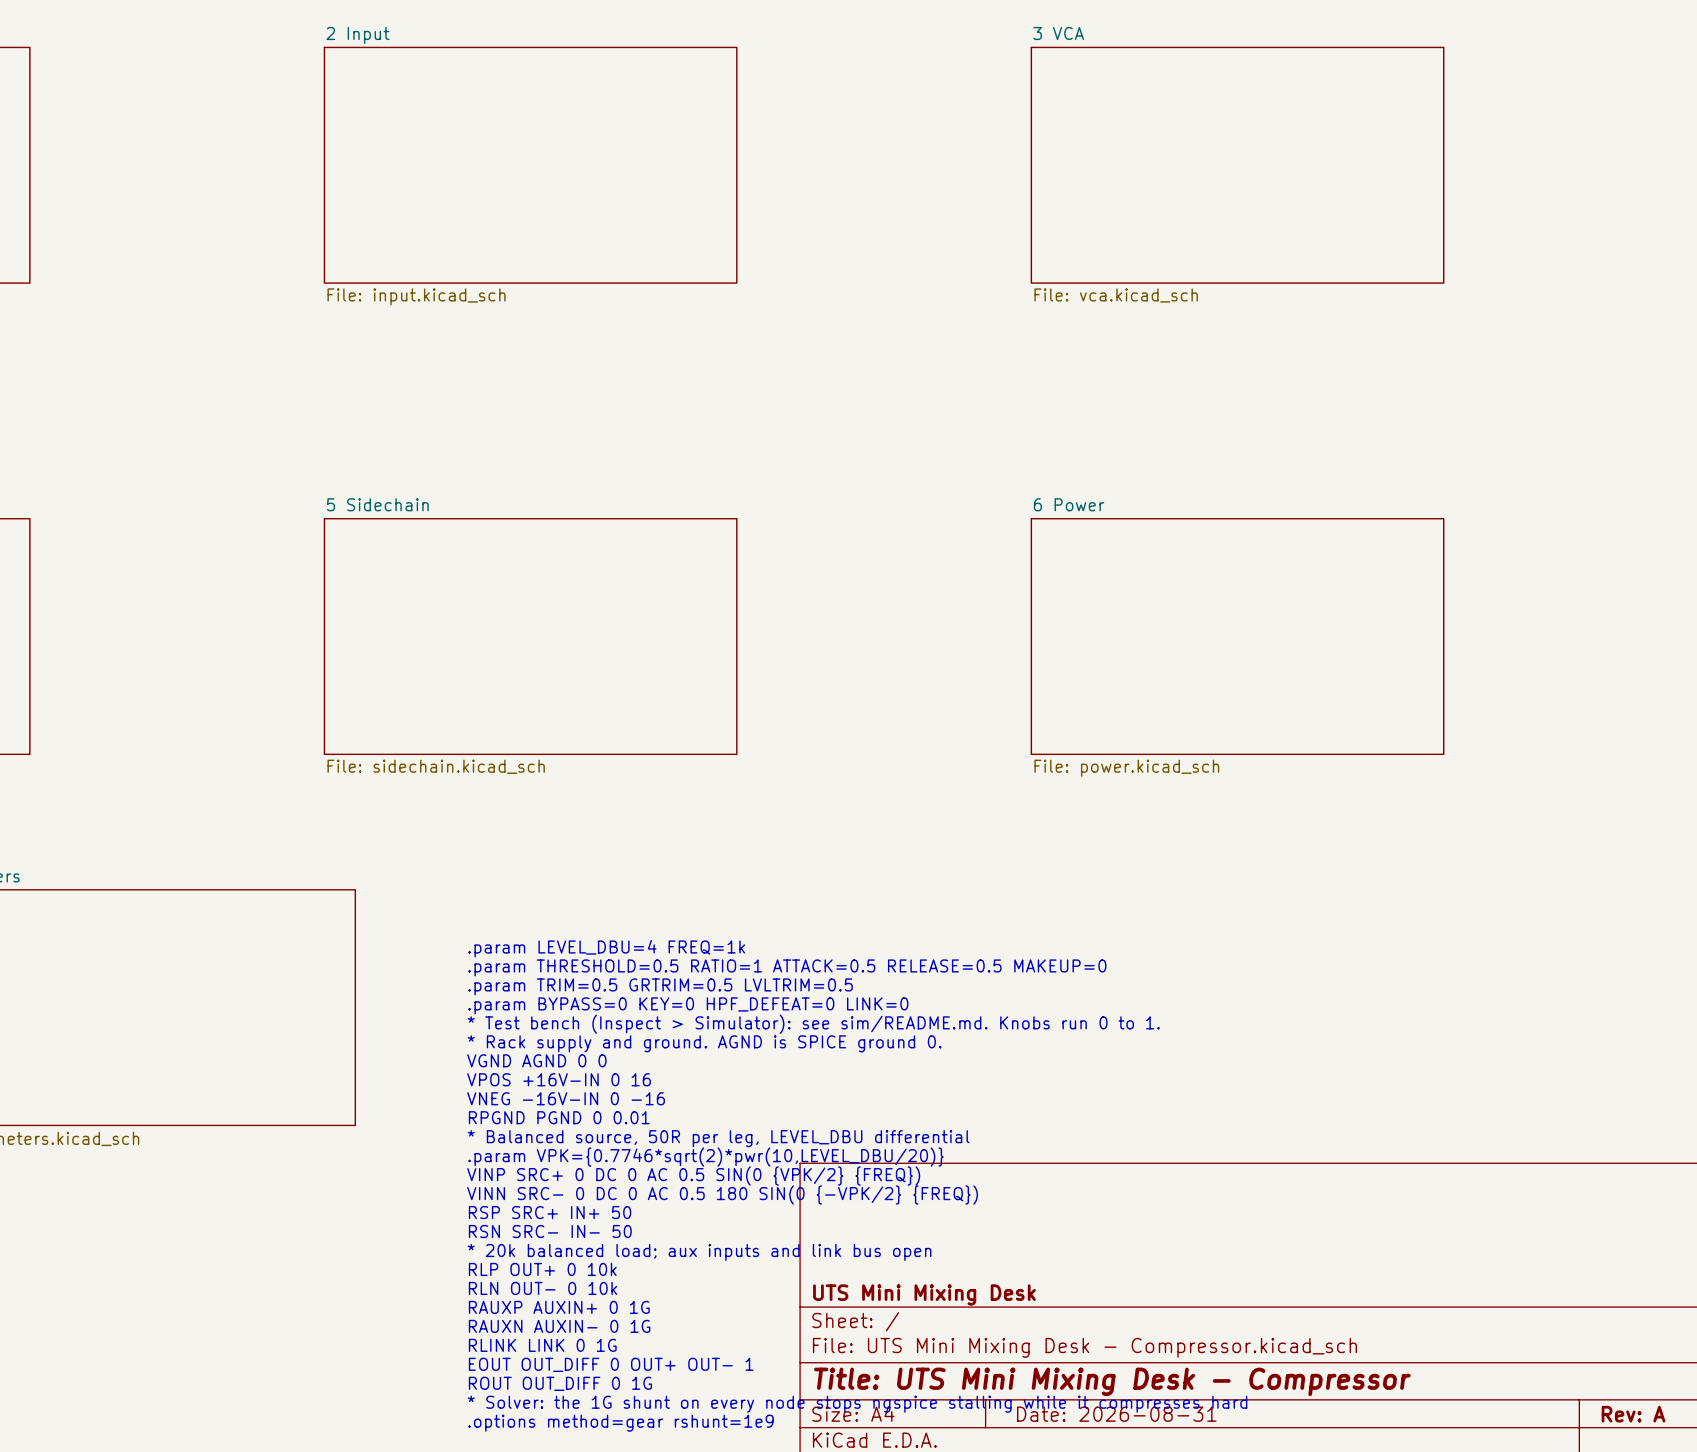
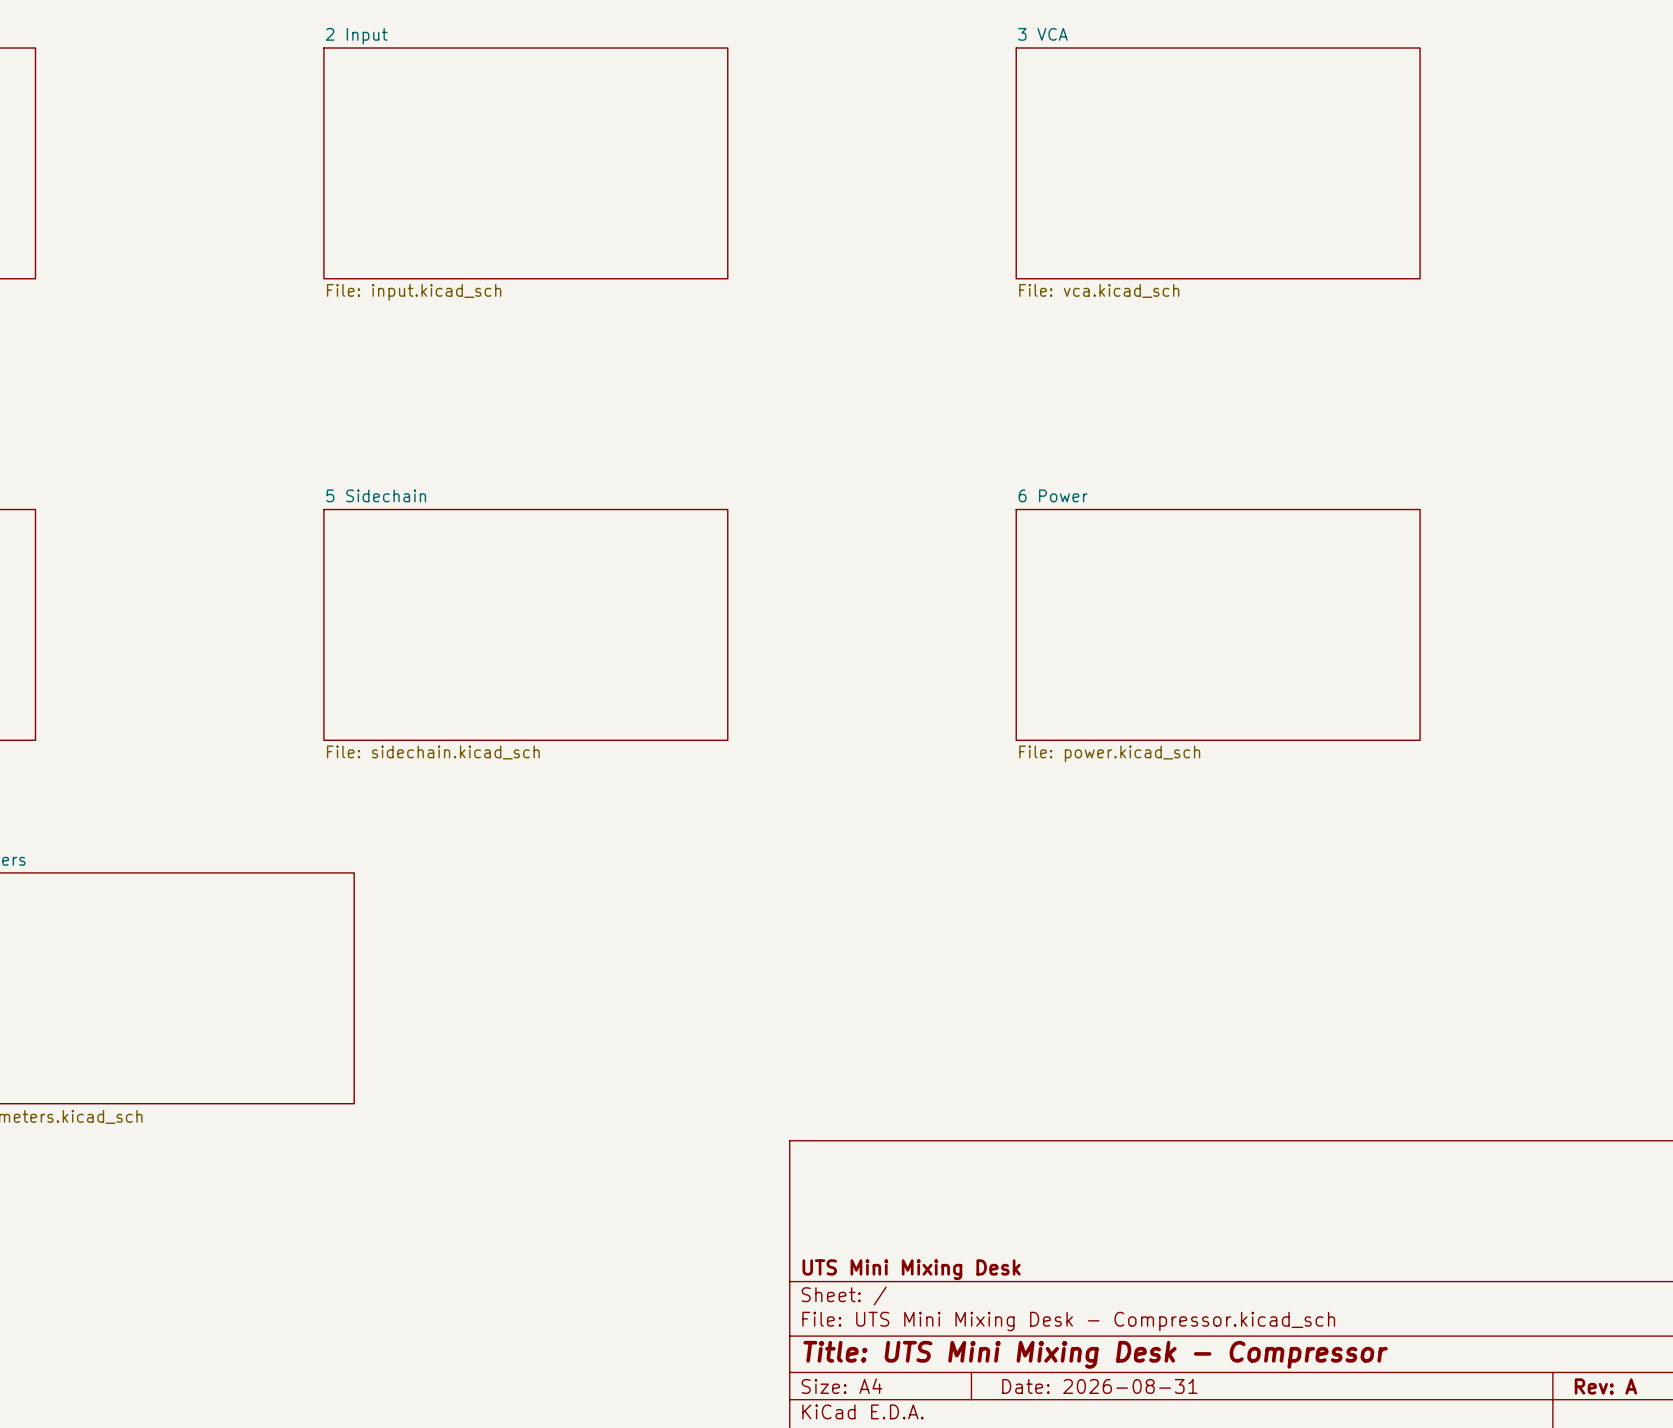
text: .param LEVEL_DBU=4 FREQ=1k (606, 948) -> none
text: .param THRESHOLD=0.5 RATIO=1 ATTACK=0.5 RELEASE=0.5 MAKEUP=0 (787, 967) -> none
text: .param TRIM=0.5 GRTRIM=0.5 LVLTRIM=0.5 (660, 986) -> none
text: .param BYPASS=0 KEY=0 HPF_DEFEAT=0 LINK=0 (688, 1005) -> none
text: * Test bench (Inspect > Simulator): see sim/README.md. Knobs run 0 to 1. (813, 1024) -> none
text: * Rack supply and ground. AGND is SPICE ground 0. (704, 1043) -> none
text: VGND AGND 0 0 (536, 1060) -> none
text: VPOS +16V-IN 0 16 (559, 1079) -> none
text: VNEG -16V-IN 0 -16 (566, 1098) -> none
text: RPGND PGND 0 0.01 (559, 1117) -> none
text: * Balanced source, 50R per leg, LEVEL_DBU differential (718, 1138) -> none
text: .param VPK={0.7746*sqrt(2)*pwr(10,LEVEL_DBU/20)} (706, 1157) -> none
text: VINP SRC+ 0 DC 0 AC 0.5 SIN(0 {VPK/2} {FREQ}) (693, 1176) -> none
text: VINN SRC- 0 DC 0 AC 0.5 180 SIN(0 {-VPK/2} {FREQ}) (722, 1194) -> none
text: RSP SRC+ IN+ 50 (550, 1212) -> none
text: RSN SRC- IN- 50 (550, 1231) -> none
text: * 20k balanced load; aux inputs and link bus open (699, 1252) -> none
text: RLP OUT+ 0 10k (542, 1269) -> none
text: RLN OUT- 0 10k (543, 1288) -> none
text: RAUXP AUXIN+ 0 1G (559, 1307) -> none
text: RAUXN AUXIN- 0 1G (559, 1326) -> none
text: RLINK LINK 0 1G (542, 1345) -> none
text: EOUT OUT_DIFF 0 OUT+ OUT- 1 (611, 1364) -> none
text: ROUT OUT_DIFF 0 1G (560, 1383) -> none
text: * Solver: the 1G shunt on every node stops ngspice stalling while it compresses hard (857, 1404) -> none
text: .options method=gear rshunt=1e9 (621, 1423) -> none

